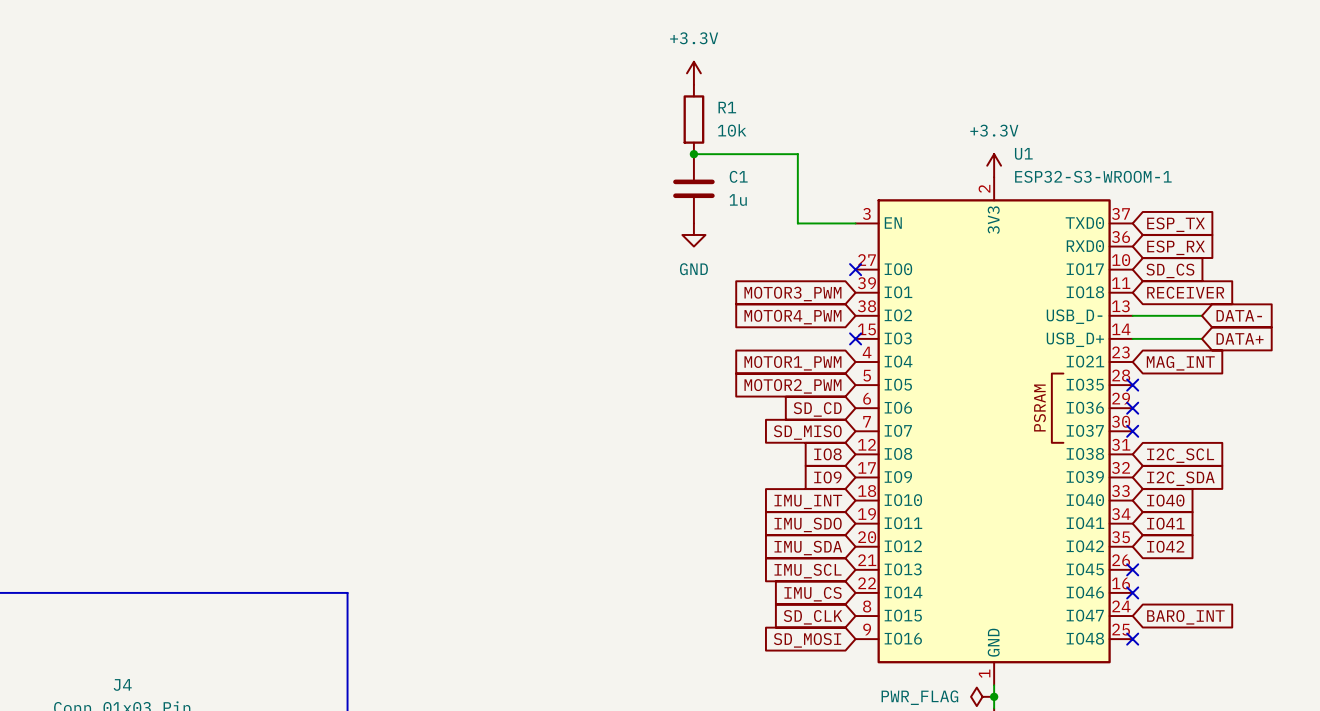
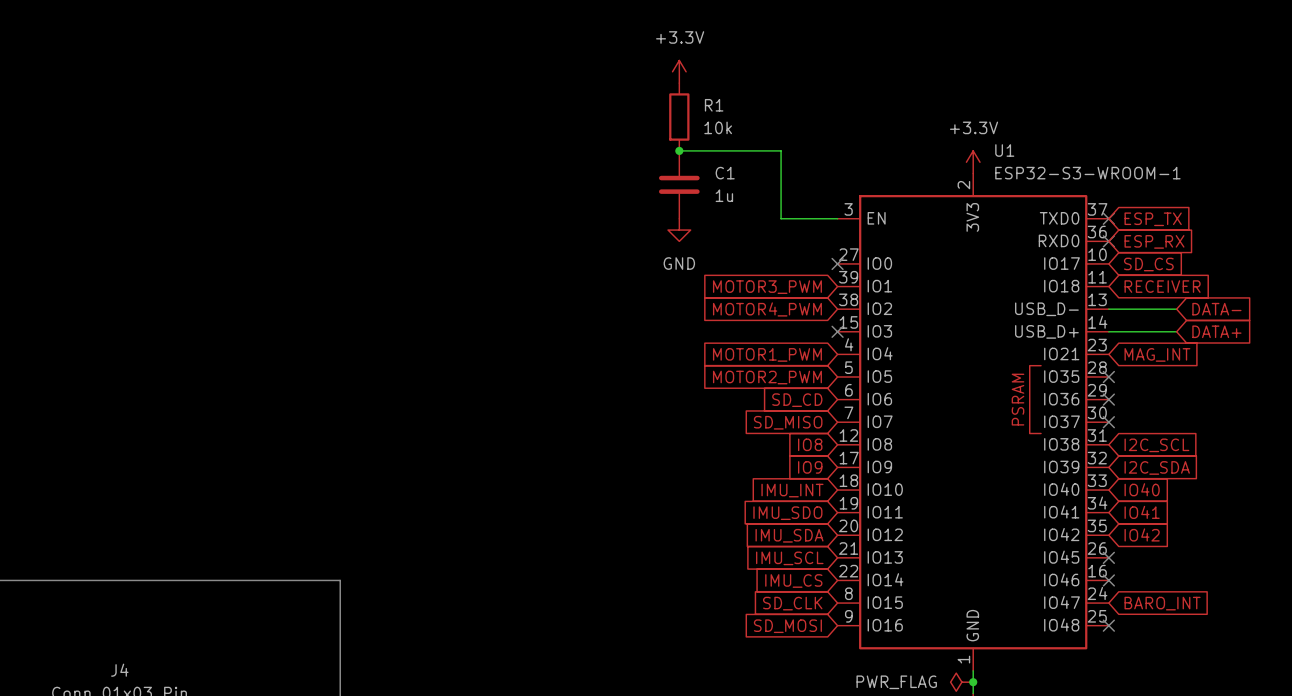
no-connect mark: none -> (1108, 218)
no-connect mark: none -> (1108, 241)

